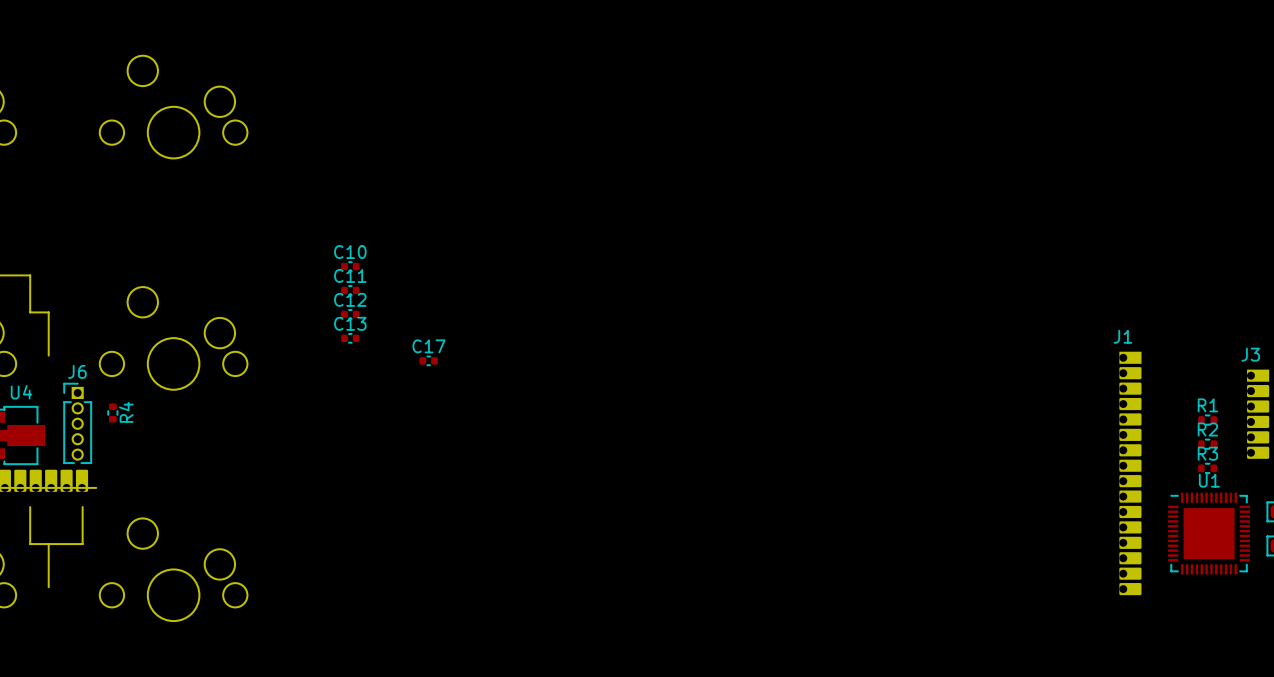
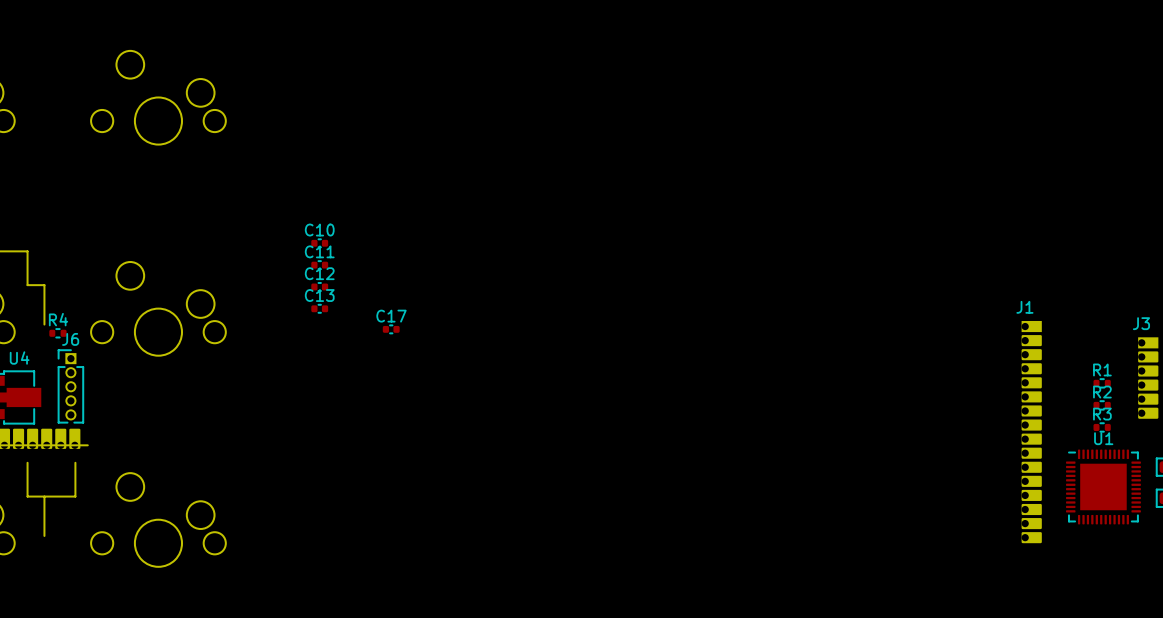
R4 rotation: 0° (112, 412) -> 90° clockwise (57, 333)
R4 position: (112, 412) -> (57, 333)

